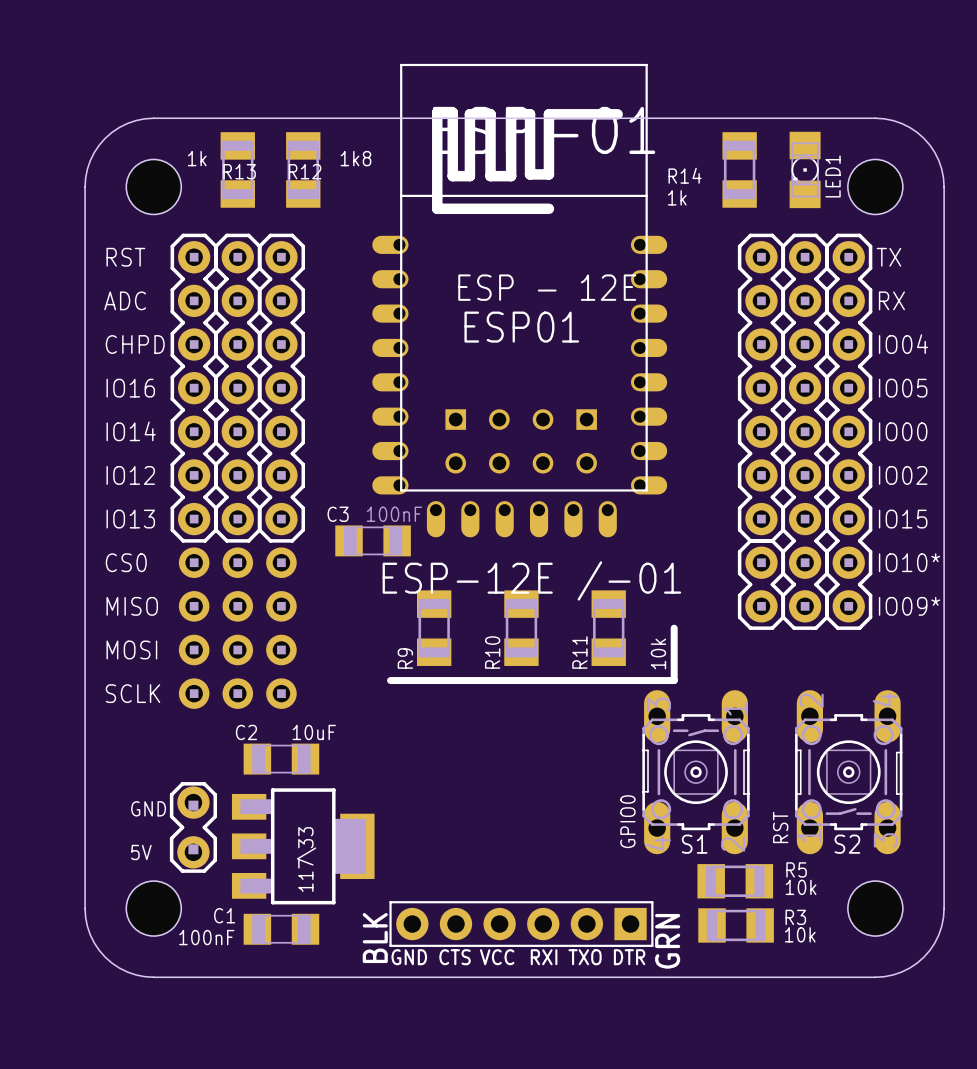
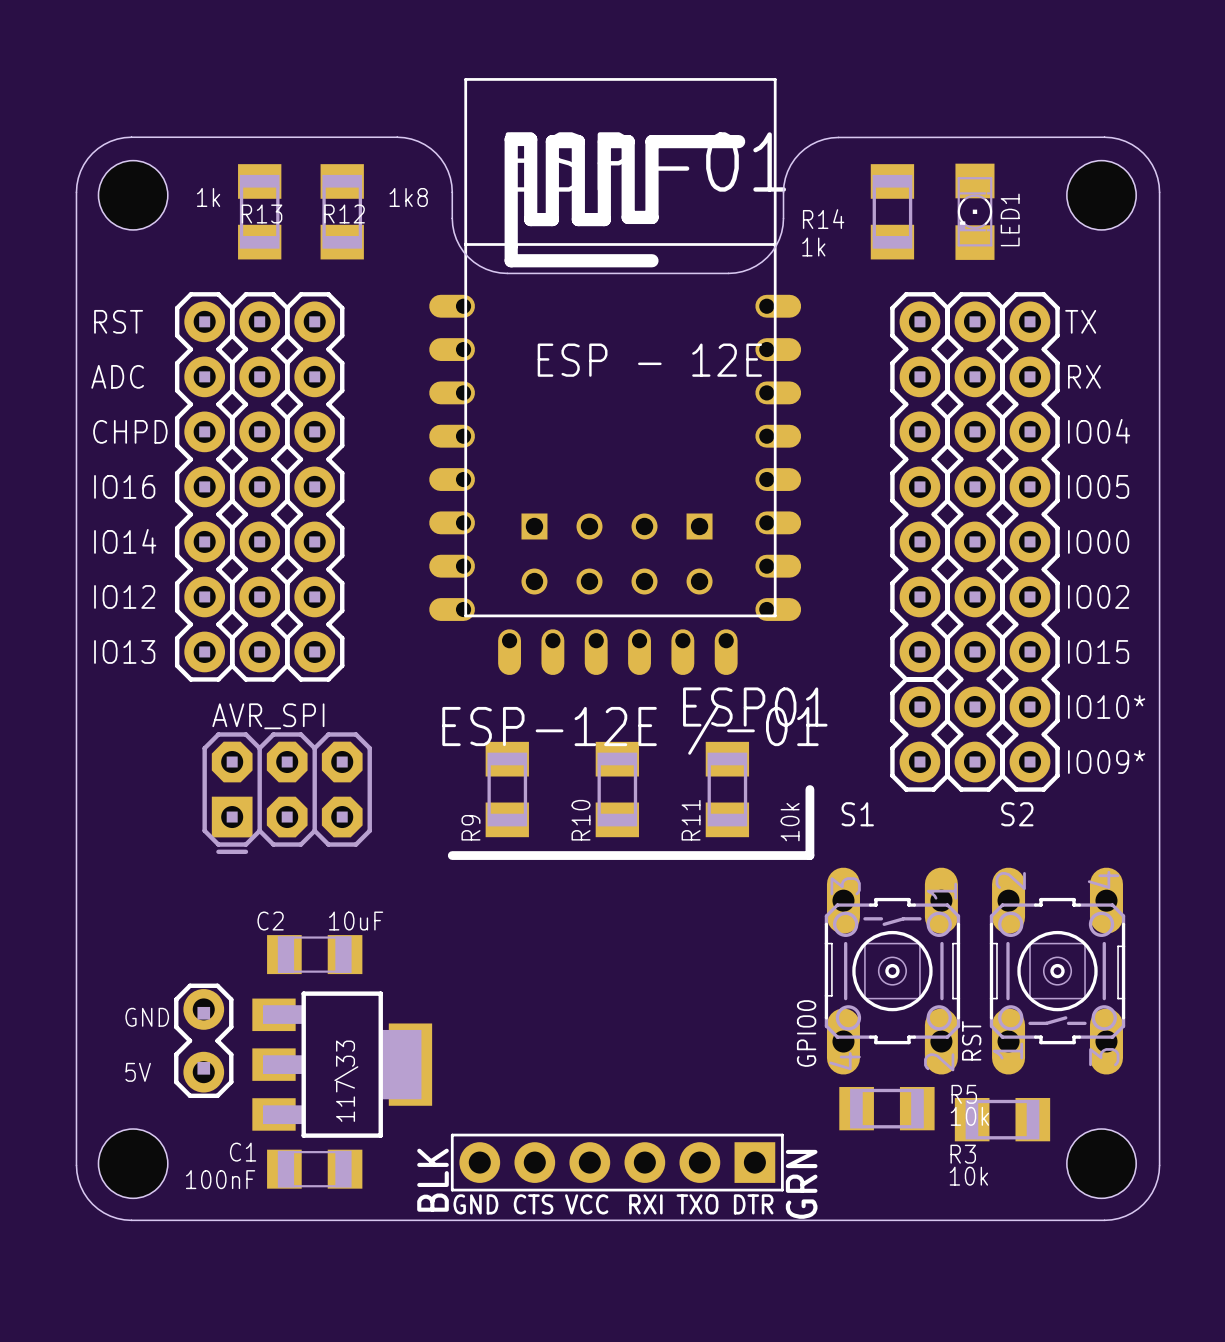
board edge: none -> (131, 137) (397, 137) (418, 141) (436, 153) (448, 171) (451, 185) (452, 225) (456, 239) (463, 251) (473, 262) (486, 269) (507, 273) (728, 273) (749, 269) (767, 257) (779, 239) (783, 225) (783, 185) (790, 164) (805, 148) (817, 141) (831, 137) (1104, 137) (1125, 141) (1143, 153) (1155, 171) (1159, 192) (1159, 1165) (1155, 1186) (1143, 1204) (1125, 1216) (1104, 1220) (131, 1220) (110, 1216) (92, 1204) (80, 1186) (76, 1165) (76, 192) (80, 171) (92, 153) (110, 141) (131, 137)
hole: none -> (133, 195)
hole: none -> (1101, 195)
part value position: ESP01 (521, 327) -> ESP01 (755, 707)
C3: 100nF (373, 540) -> none
part: (514, 547) -> none
text: CS0 (126, 562) -> none
text: MISO (132, 606) -> none
part: (194, 628) -> none
part: (237, 628) -> none
part: (281, 628) -> none
part: none -> AVR_SPI (287, 793)
text: MOSI (131, 649) -> none
text: SCLK (132, 693) -> none
S1 position: (696, 772) -> (892, 971)
S2 position: (848, 772) -> (1057, 971)
S1 name position: S1 (694, 844) -> S1 (857, 814)
S2 name position: S2 (847, 844) -> S2 (1017, 814)
hole: none -> (133, 1163)
hole: none -> (1101, 1163)
R3 position: (736, 925) -> (1002, 1119)

